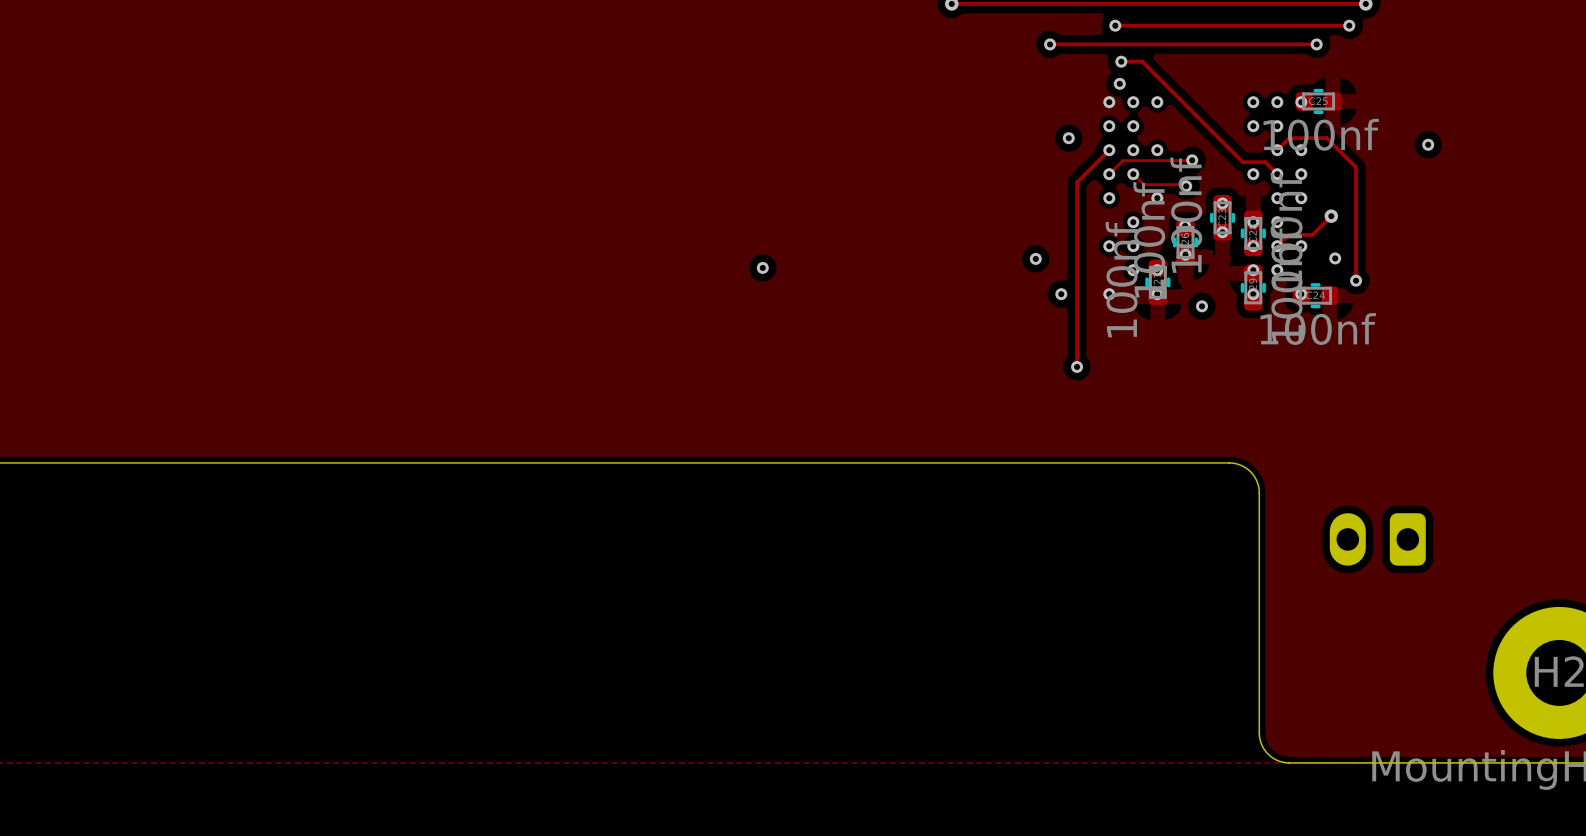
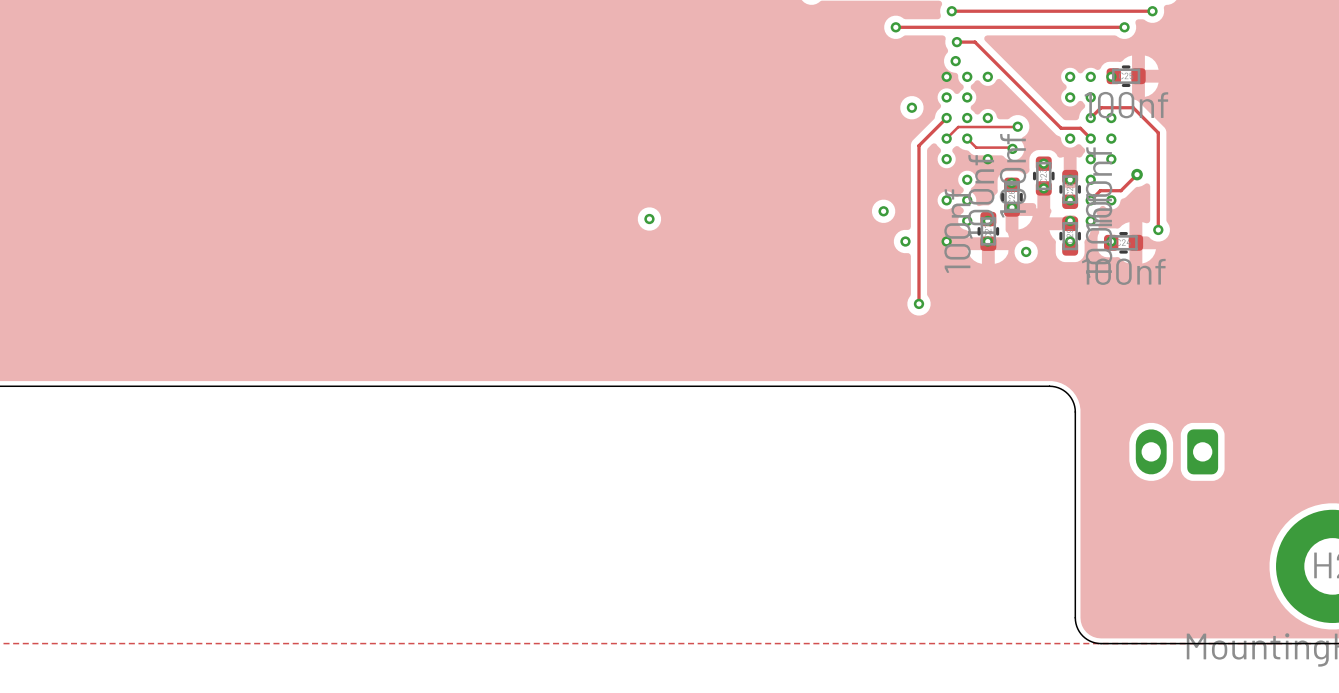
via: (1428, 144) -> none
via: (1335, 258) -> none

